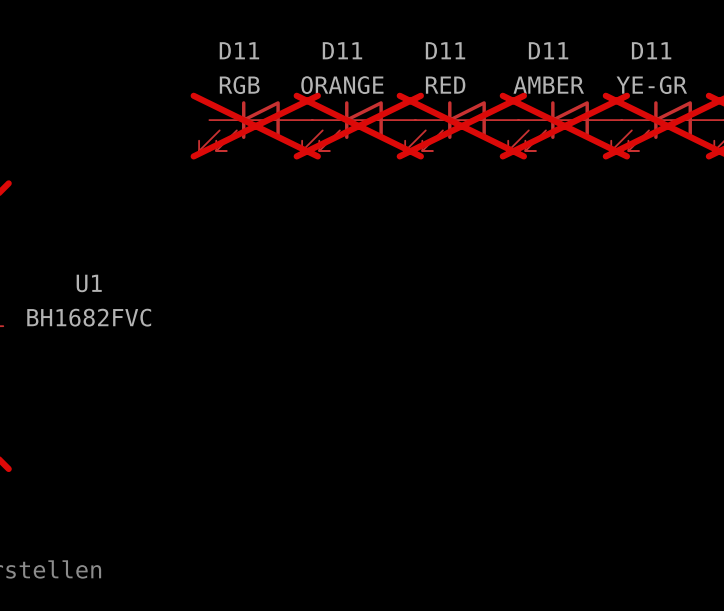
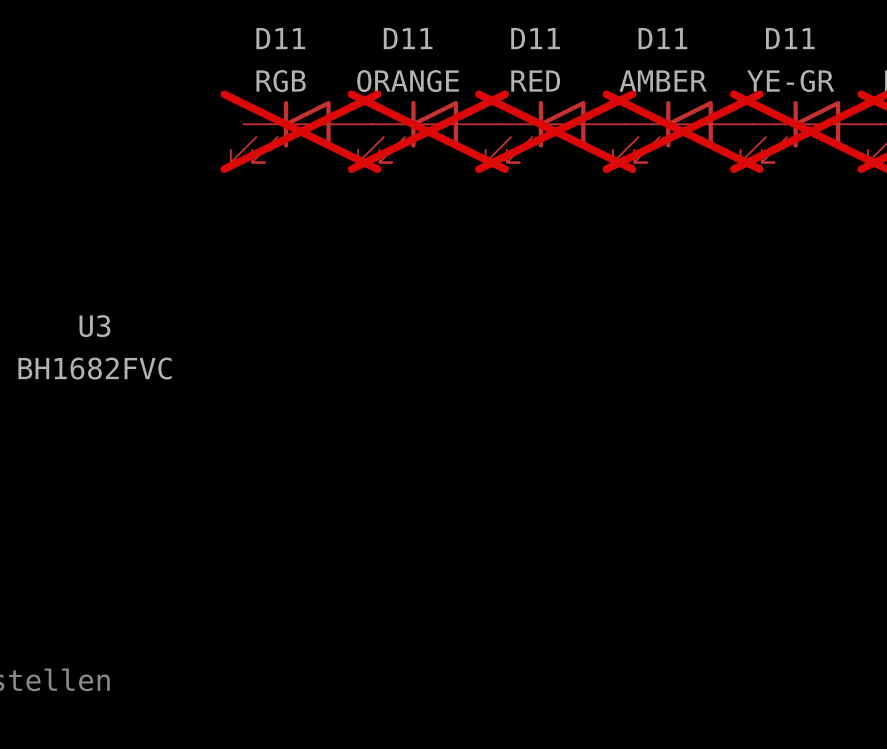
U1 name: U1 (89, 283) -> U3 (94, 326)

